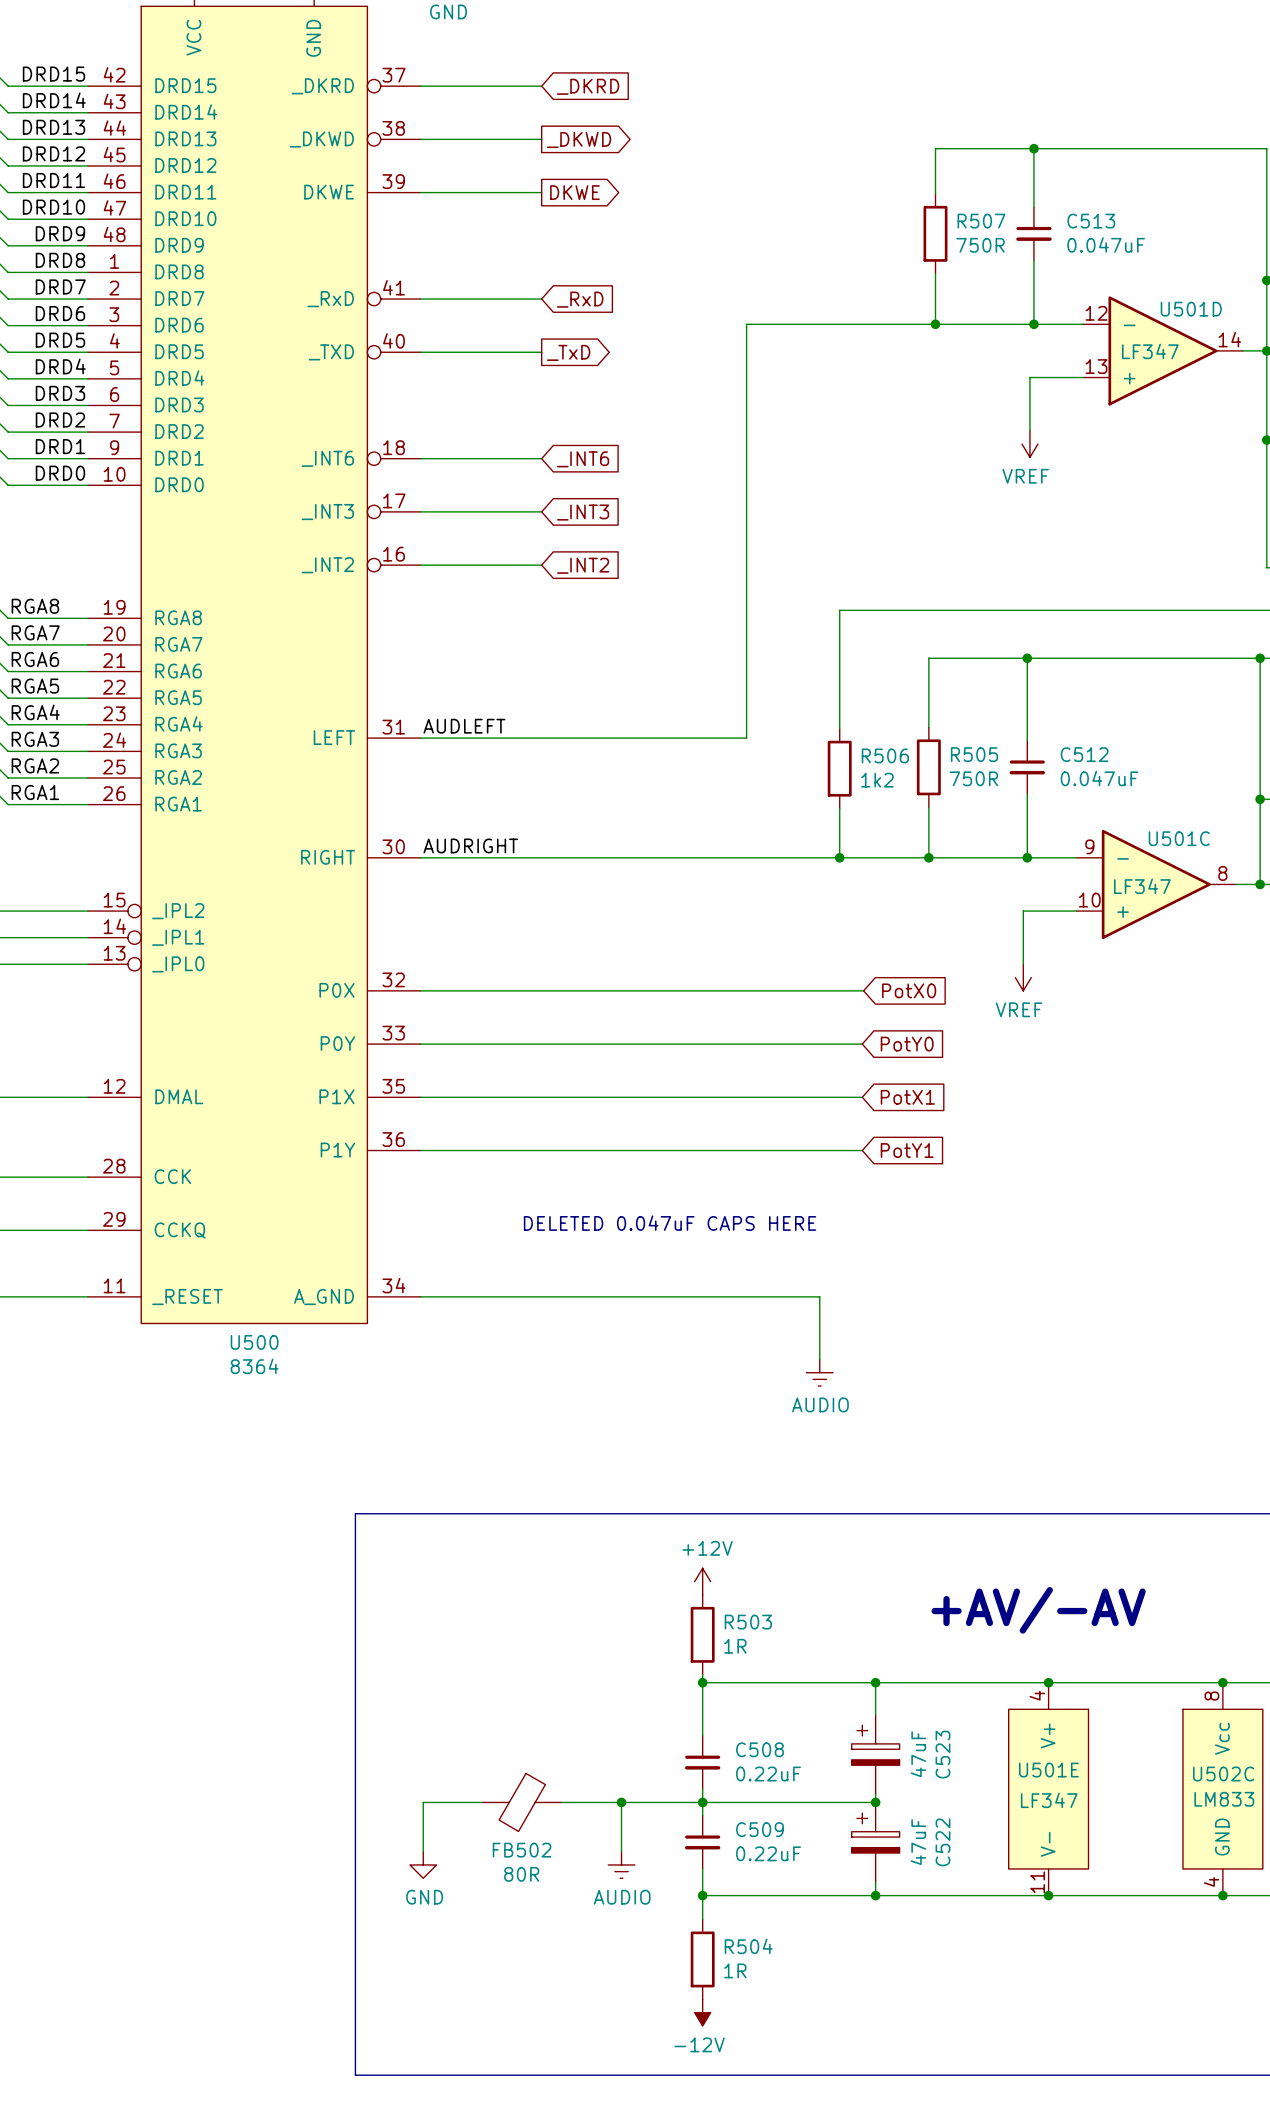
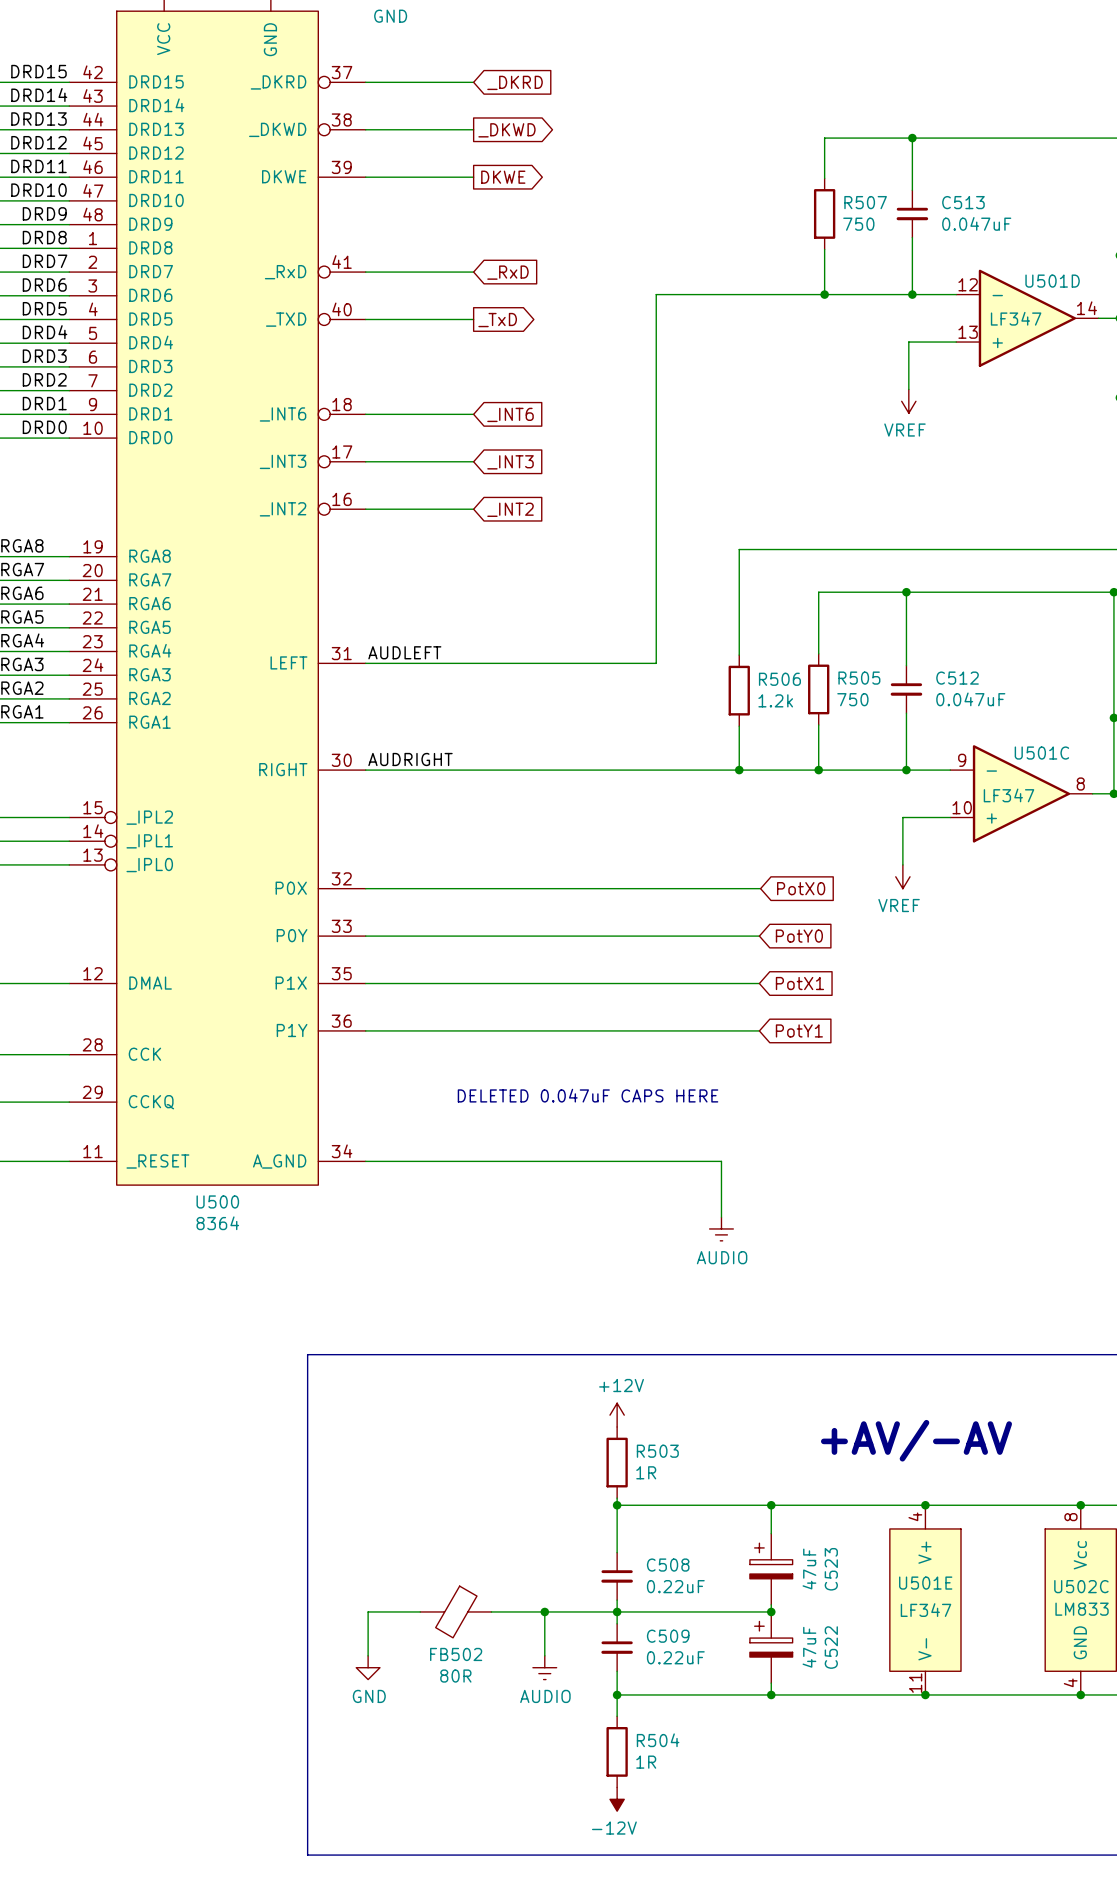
R507 value: 750R (980, 245) -> 750 (858, 224)
R505 value: 750R (973, 778) -> 750 (852, 699)
R506 value: 1k2 (877, 780) -> 1.2k (775, 700)

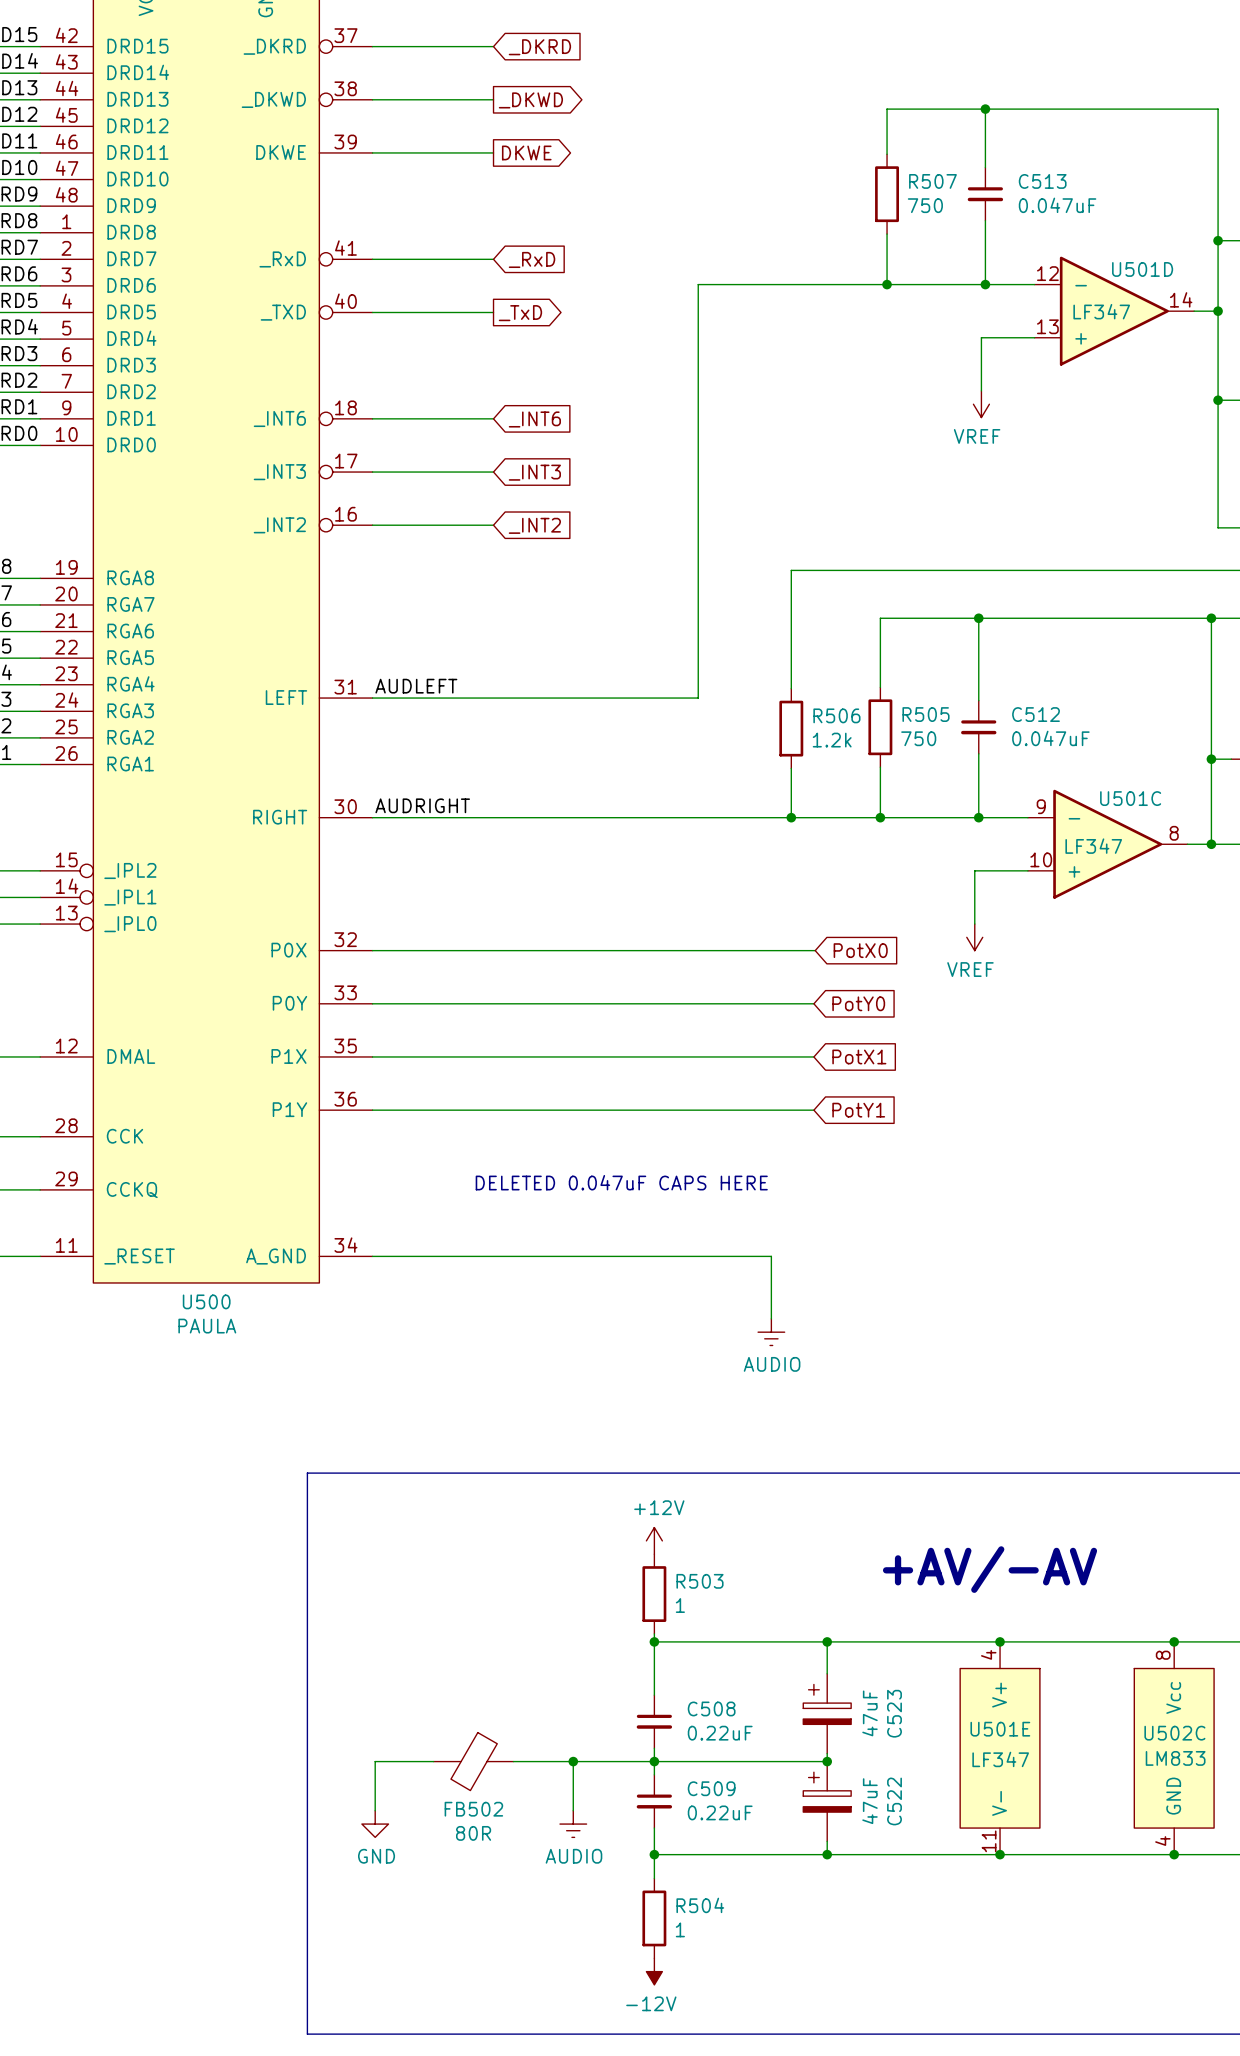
U500 value: 8364 (217, 1223) -> PAULA (207, 1326)
R503 value: 1R (646, 1472) -> 1 (680, 1605)
R504 value: 1R (646, 1762) -> 1 (680, 1929)

